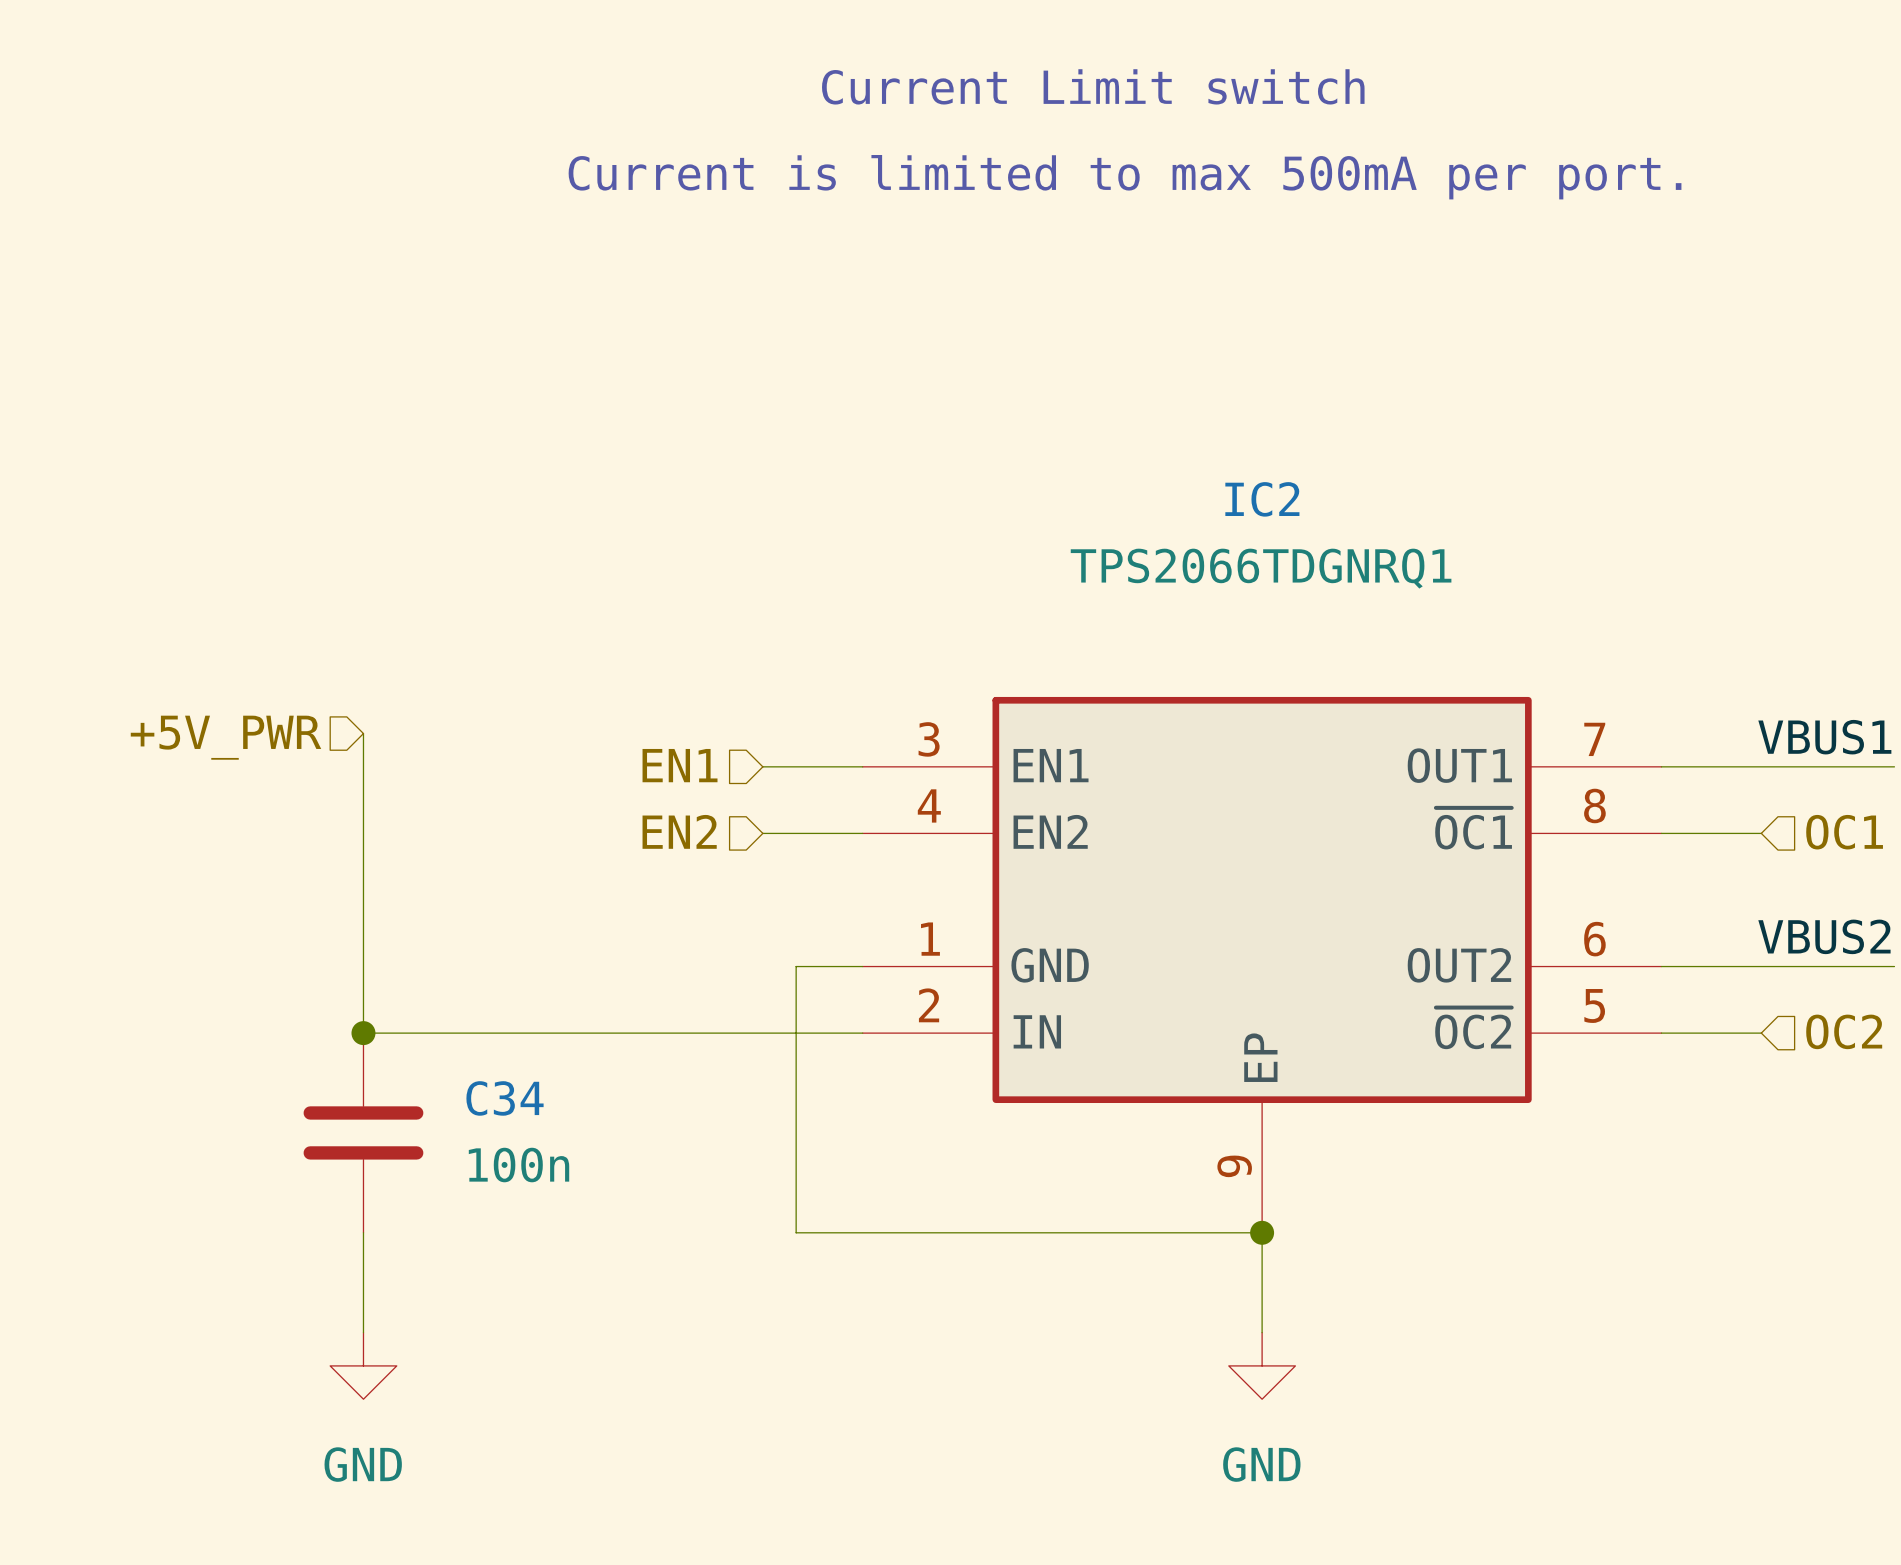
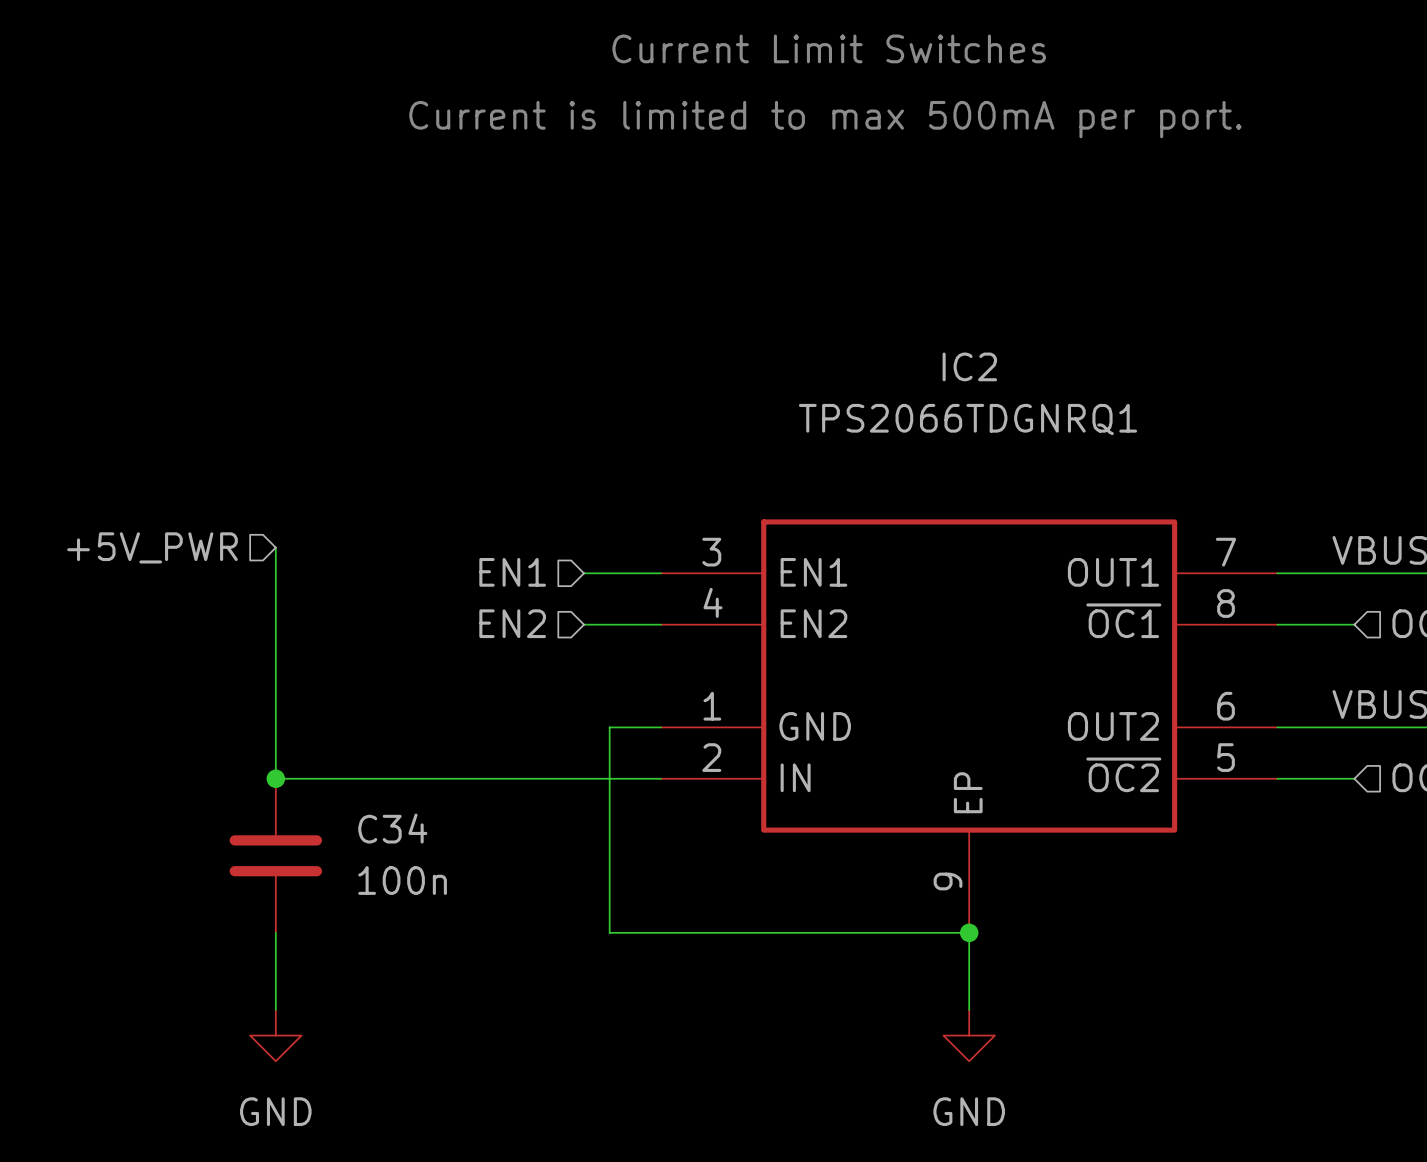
text: Current Limit switch (1093, 86) -> Current Limit Switches (829, 48)
text position: Current is limited to max 500mA per port. (1125, 177) -> Current is limited to max 500mA per port. (825, 119)

